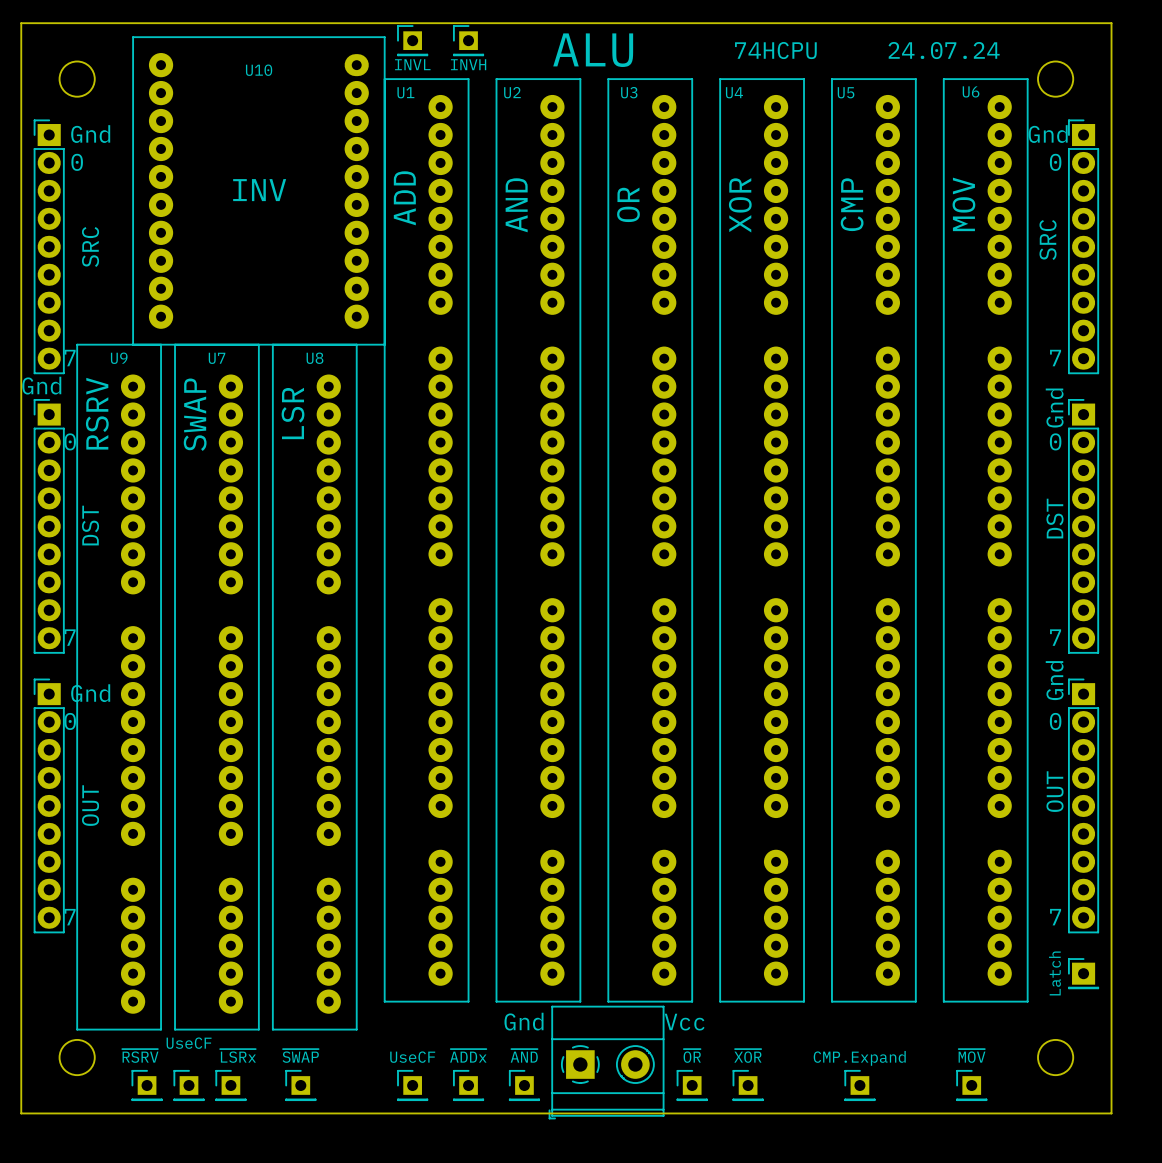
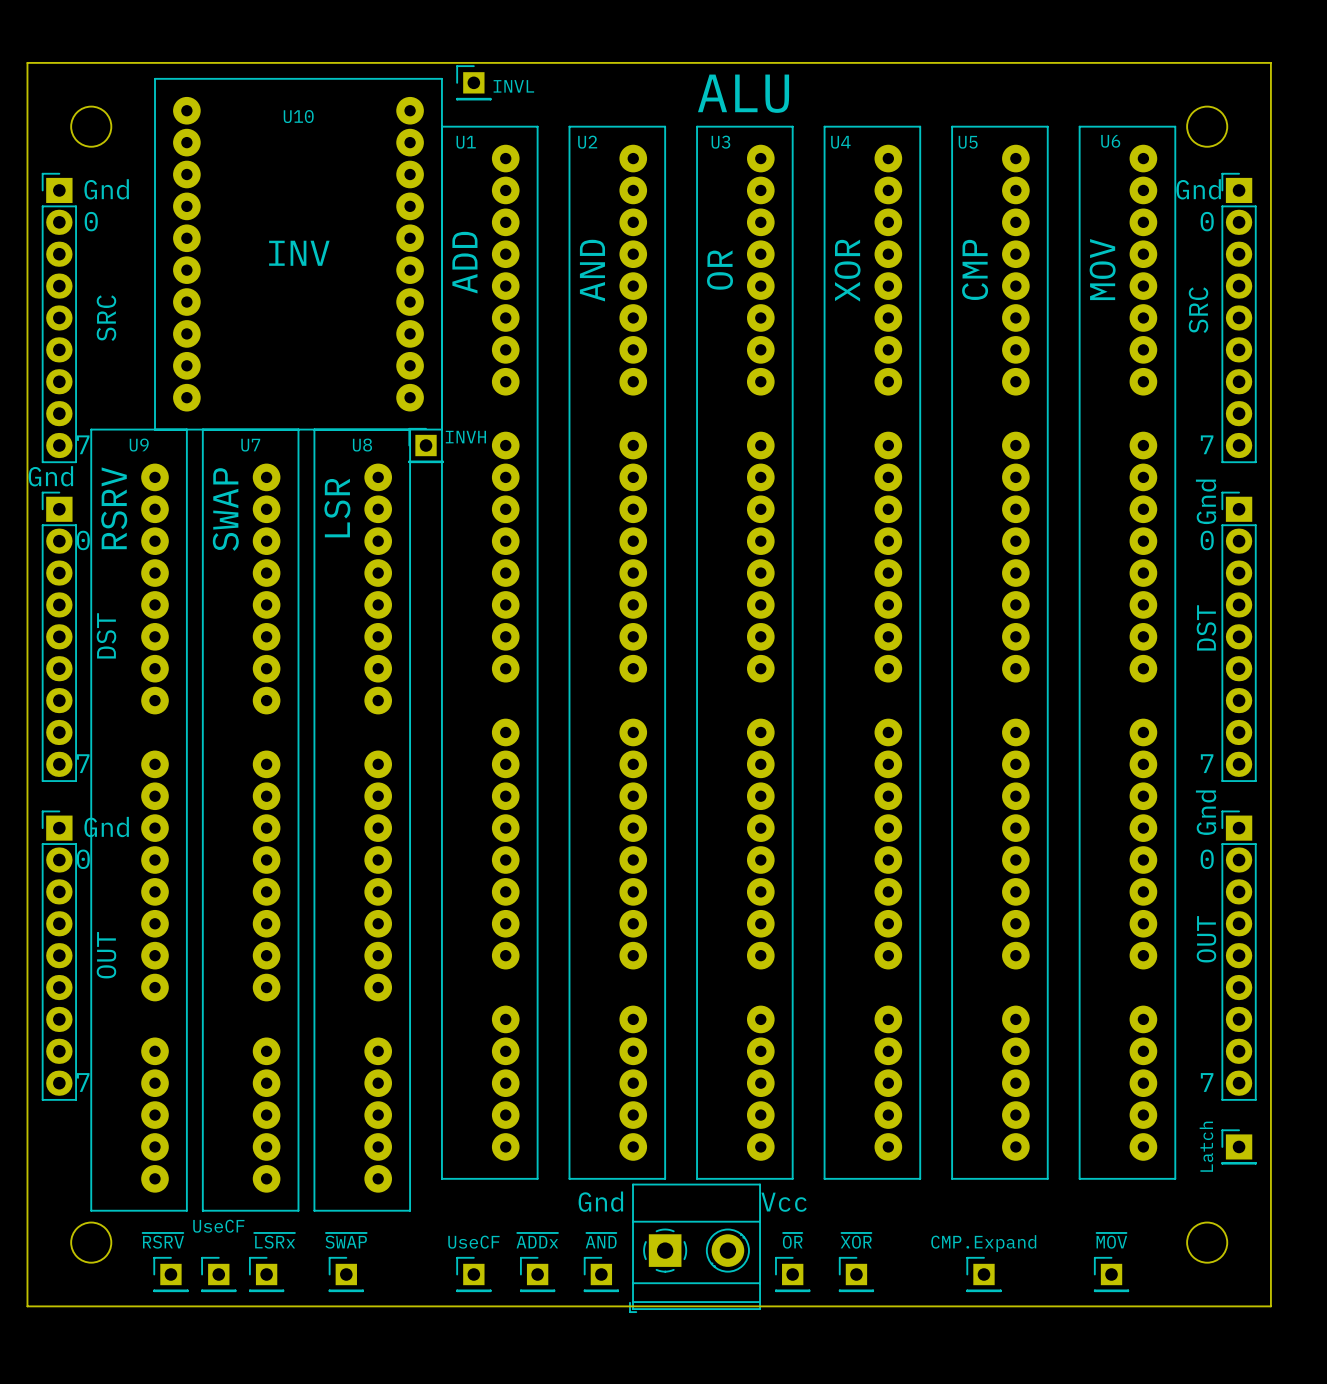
U10 footprint: [132, 36, 386, 346] -> [154, 77, 443, 431]
part: (468, 40) -> none
text position: ALU (593, 50) -> ALU (743, 93)
text: 74HCPU (775, 50) -> none
text: 24.07.24 (944, 50) -> none
text position: INVL (412, 64) -> INVL (513, 86)
text: INVH (468, 64) -> none
text: none -> INVH (465, 437)
part: none -> (426, 445)

